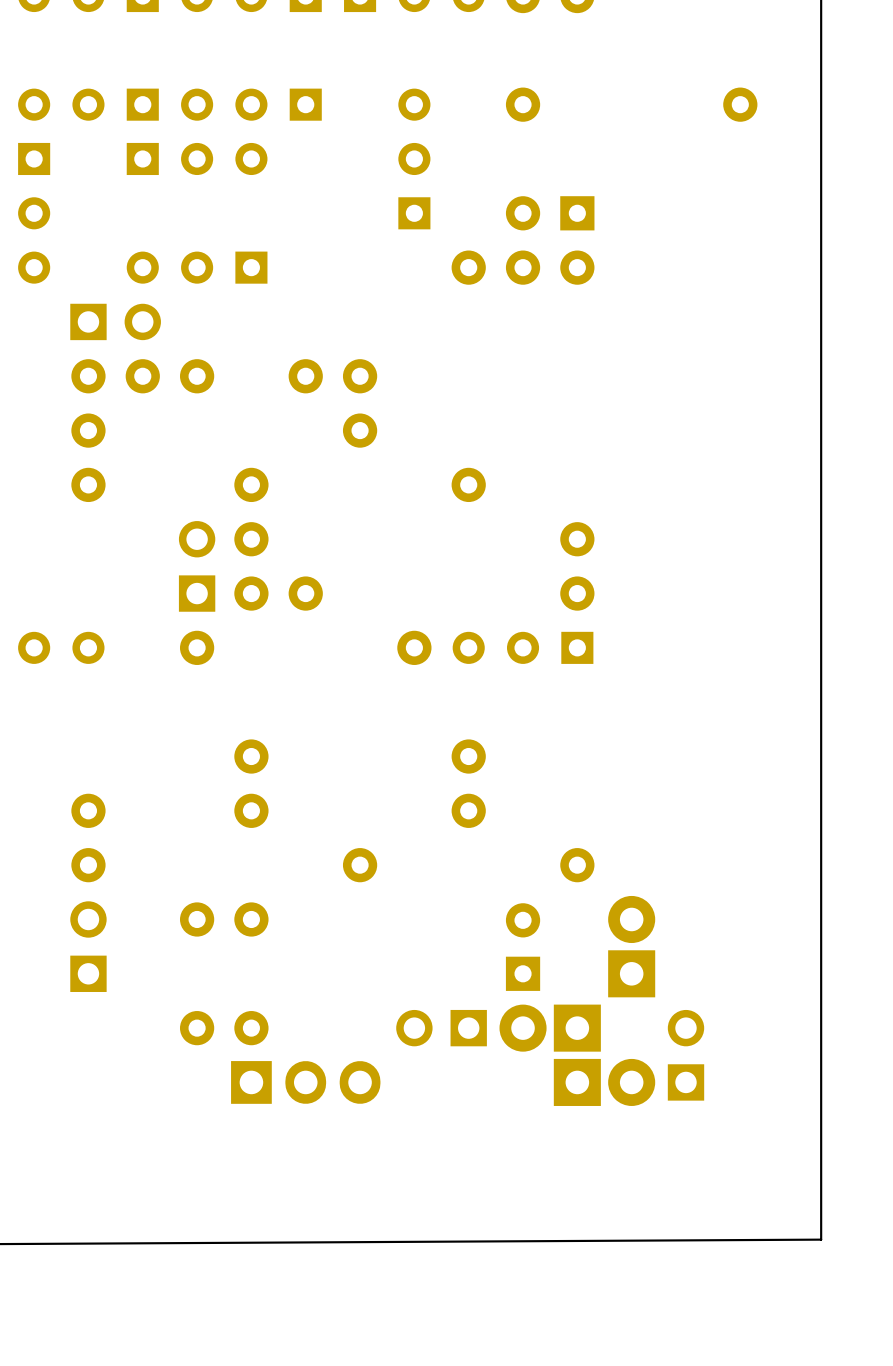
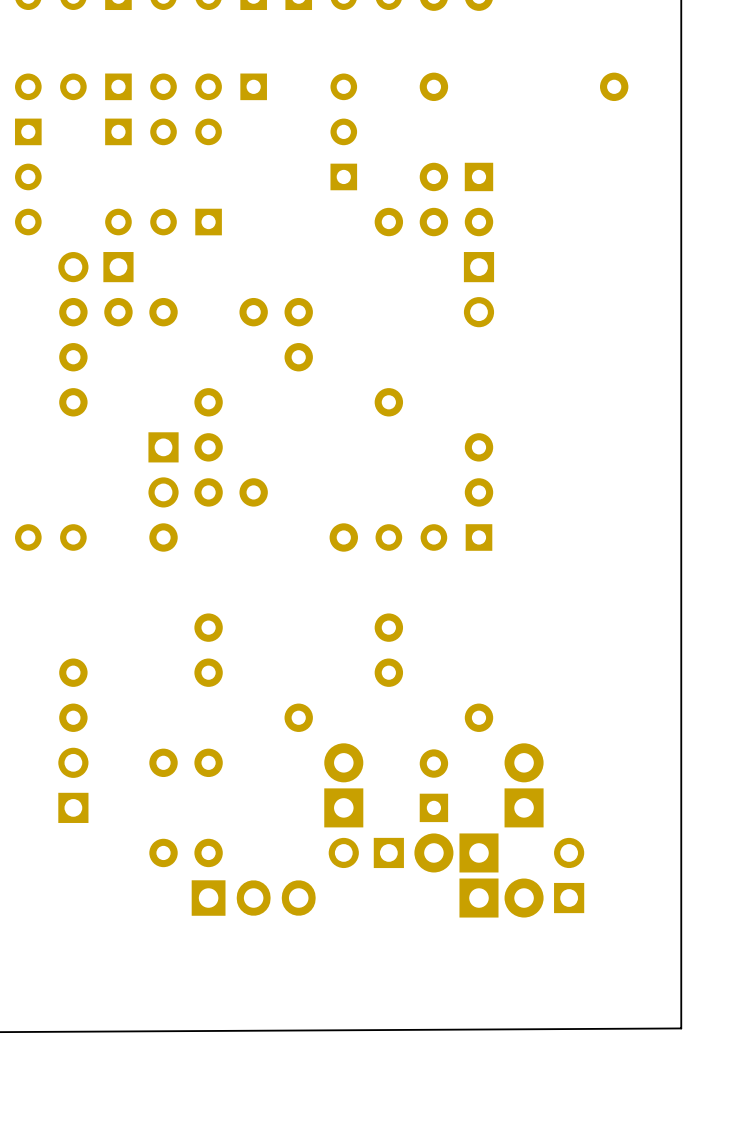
part rotation: 0° (115, 321) -> 180° (95, 267)
part: none -> (478, 289)
part rotation: 0° (197, 566) -> 180° (163, 469)
part: none -> (343, 785)

